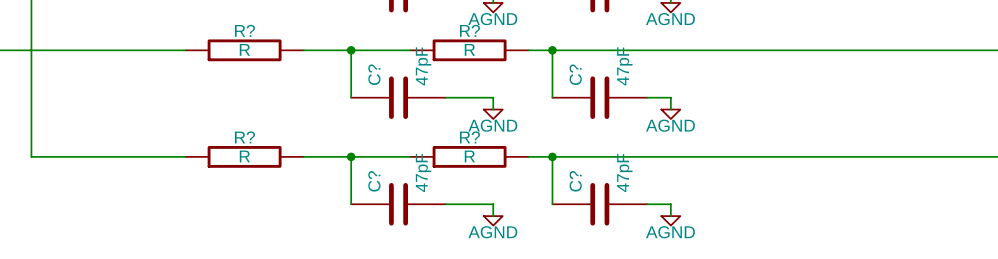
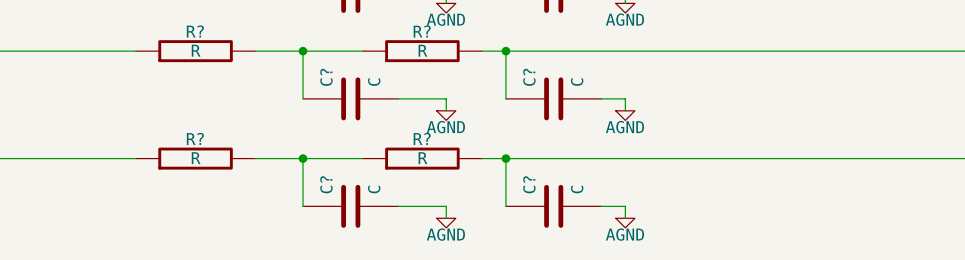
C? value: 47pF (423, 66) -> C (374, 82)
C? value: 47pF (624, 66) -> C (577, 82)
C? value: 47pF (423, 172) -> C (374, 189)
C? value: 47pF (624, 172) -> C (577, 189)

